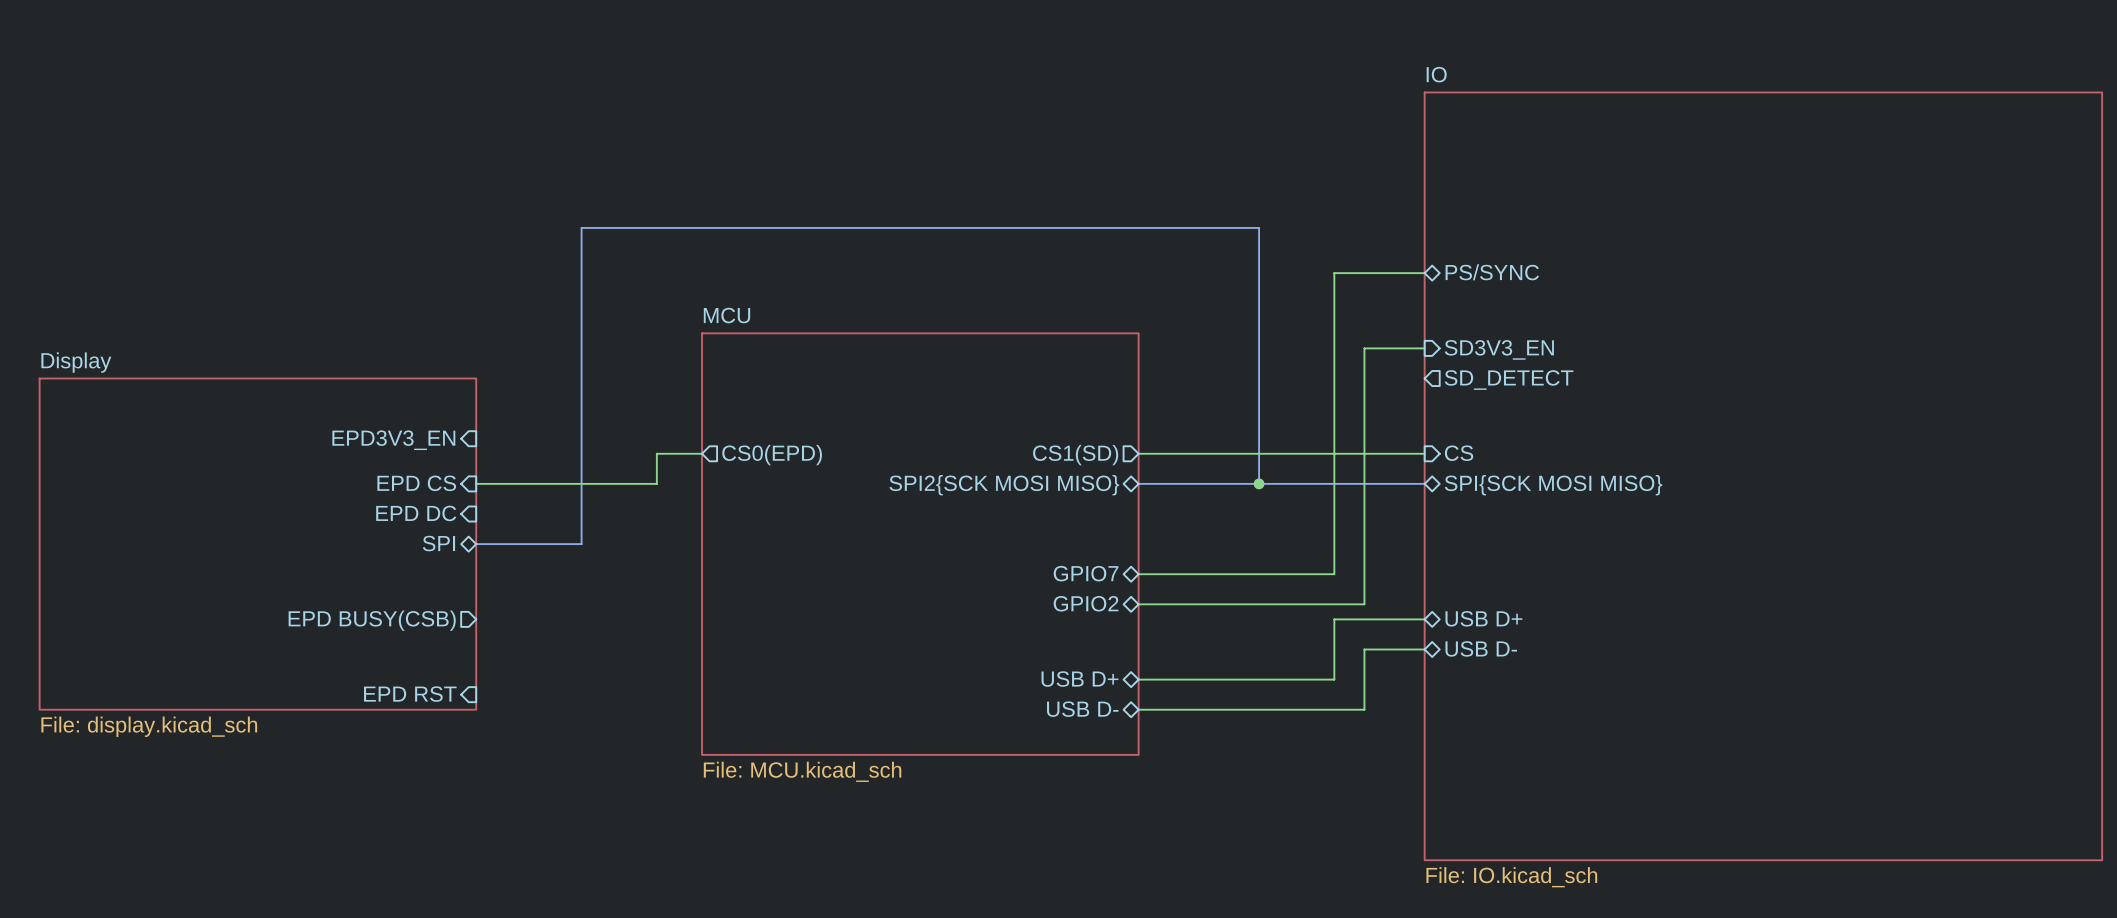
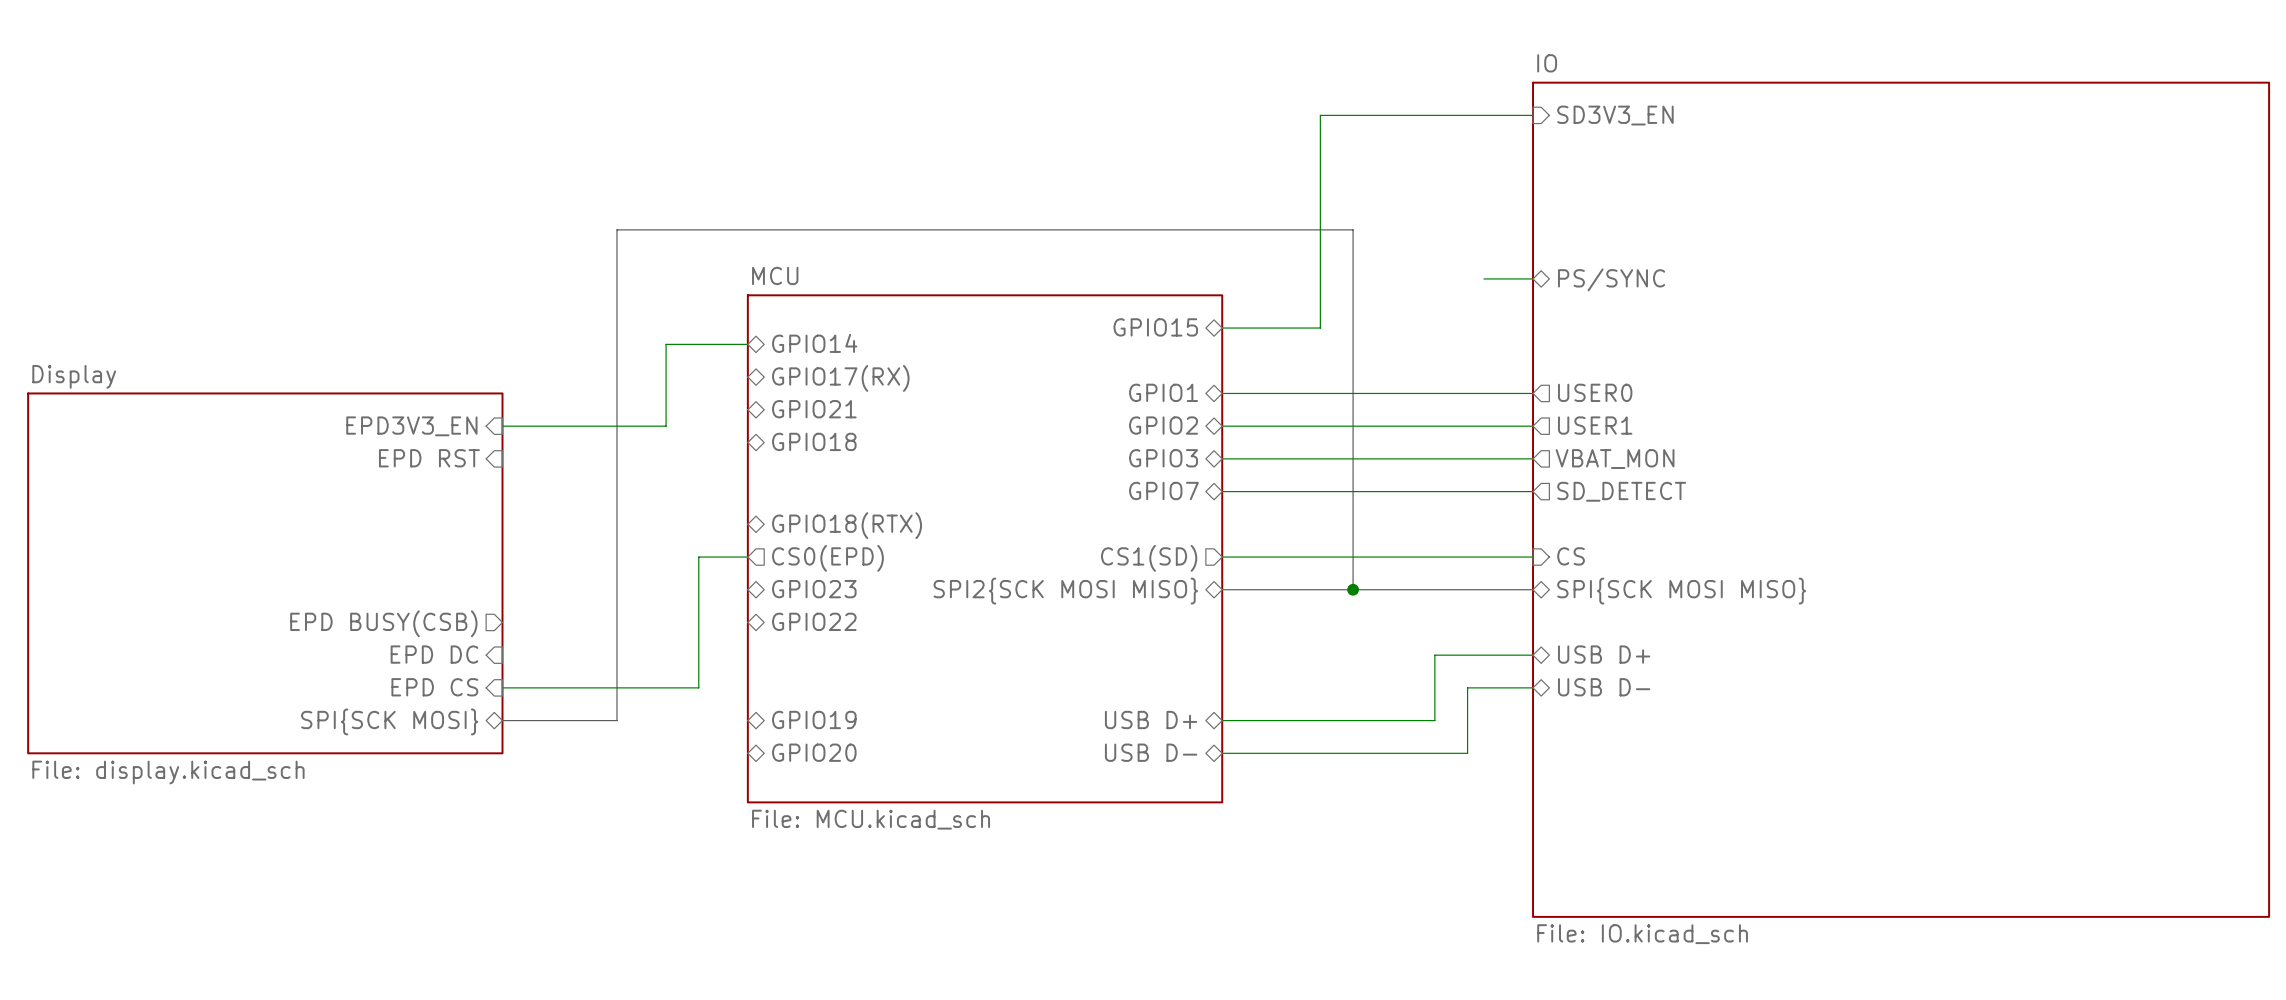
wire: none -> (1533, 115) (1320, 115) (1320, 328) (1222, 328)
wire: (1379, 273) (1334, 273) (1334, 574) (1138, 574) -> none
sheet pin: none -> GPIO15 (1155, 327)
sheet pin: none -> GPIO14 (814, 343)
wire: none -> (747, 344) (666, 344) (666, 426) (502, 426)
wire: (1424, 348) (1364, 348) (1364, 604) (1138, 604) -> none
sheet pin position: SD3V3_EN (1499, 349) -> SD3V3_EN (1615, 115)
sheet pin: none -> GPIO17(RX) (840, 378)
sheet pin: none -> GPIO1 (1163, 392)
wire: none -> (1222, 393) (1533, 393)
sheet pin: SD_DETECT (1509, 380) -> USER0 (1595, 392)
sheet pin: none -> GPIO21 (814, 409)
wire: none -> (1222, 426) (1533, 426)
sheet pin: none -> USER1 (1595, 425)
sheet pin: none -> EPD3V3_EN (411, 426)
sheet pin: none -> GPIO18 (814, 441)
sheet pin: none -> GPIO3 (1163, 458)
sheet pin: EPD3V3_EN (393, 440) -> EPD RST (429, 458)
sheet pin: none -> VBAT_MON (1615, 459)
wire: (702, 453) (656, 453) (656, 483) (476, 483) -> none
wire: (1138, 453) (1424, 453) -> (1222, 458) (1533, 458)
sheet pin position: CS (1459, 453) -> CS (1571, 556)
sheet pin position: CS0(EPD) (772, 455) -> CS0(EPD) (827, 558)
sheet pin position: CS1(SD) (1075, 455) -> CS1(SD) (1149, 558)
wire: none -> (1222, 491) (1533, 491)
sheet pin: none -> SD_DETECT (1621, 491)
sheet pin position: EPD CS (416, 483) -> EPD CS (434, 687)
bus: (1138, 483) (1424, 483) -> (1222, 589) (1533, 589)
bus: none -> (1353, 507) (1353, 589)
junction: (1259, 483) -> none
sheet pin position: SPI2{SCK MOSI MISO} (1004, 485) -> SPI2{SCK MOSI MISO} (1065, 591)
sheet pin position: SPI{SCK MOSI MISO} (1553, 485) -> SPI{SCK MOSI MISO} (1681, 591)
sheet pin: none -> GPIO18(RTX) (847, 525)
sheet pin: EPD DC (416, 513) -> none
sheet MCU: none -> File: MCU.kicad_sch (985, 548)
wire: none -> (747, 557) (698, 557) (698, 687) (502, 687)
wire: none -> (1222, 557) (1533, 557)
sheet pin: SPI (438, 543) -> none
bus: (476, 544) (581, 544) -> (502, 720) (617, 720) (617, 573)
sheet MCU: File: MCU.kicad_sch (920, 544) -> none
sheet pin: none -> GPIO23 (814, 589)
junction: none -> (1353, 589)
sheet pin position: GPIO7 (1086, 573) -> GPIO7 (1163, 490)
sheet pin: none -> GPIO22 (814, 621)
sheet pin: none -> EPD BUSY(CSB) (383, 623)
sheet pin position: GPIO2 (1086, 603) -> GPIO2 (1163, 425)
sheet pin shape: output (372, 620) -> input (434, 654)
sheet pin: EPD BUSY(CSB) (372, 620) -> EPD DC (434, 654)
sheet pin: none -> GPIO19 (814, 719)
sheet pin: none -> SPI{SCK MOSI} (389, 721)
sheet pin: EPD RST (410, 694) -> none
sheet pin: none -> GPIO20 (814, 752)

